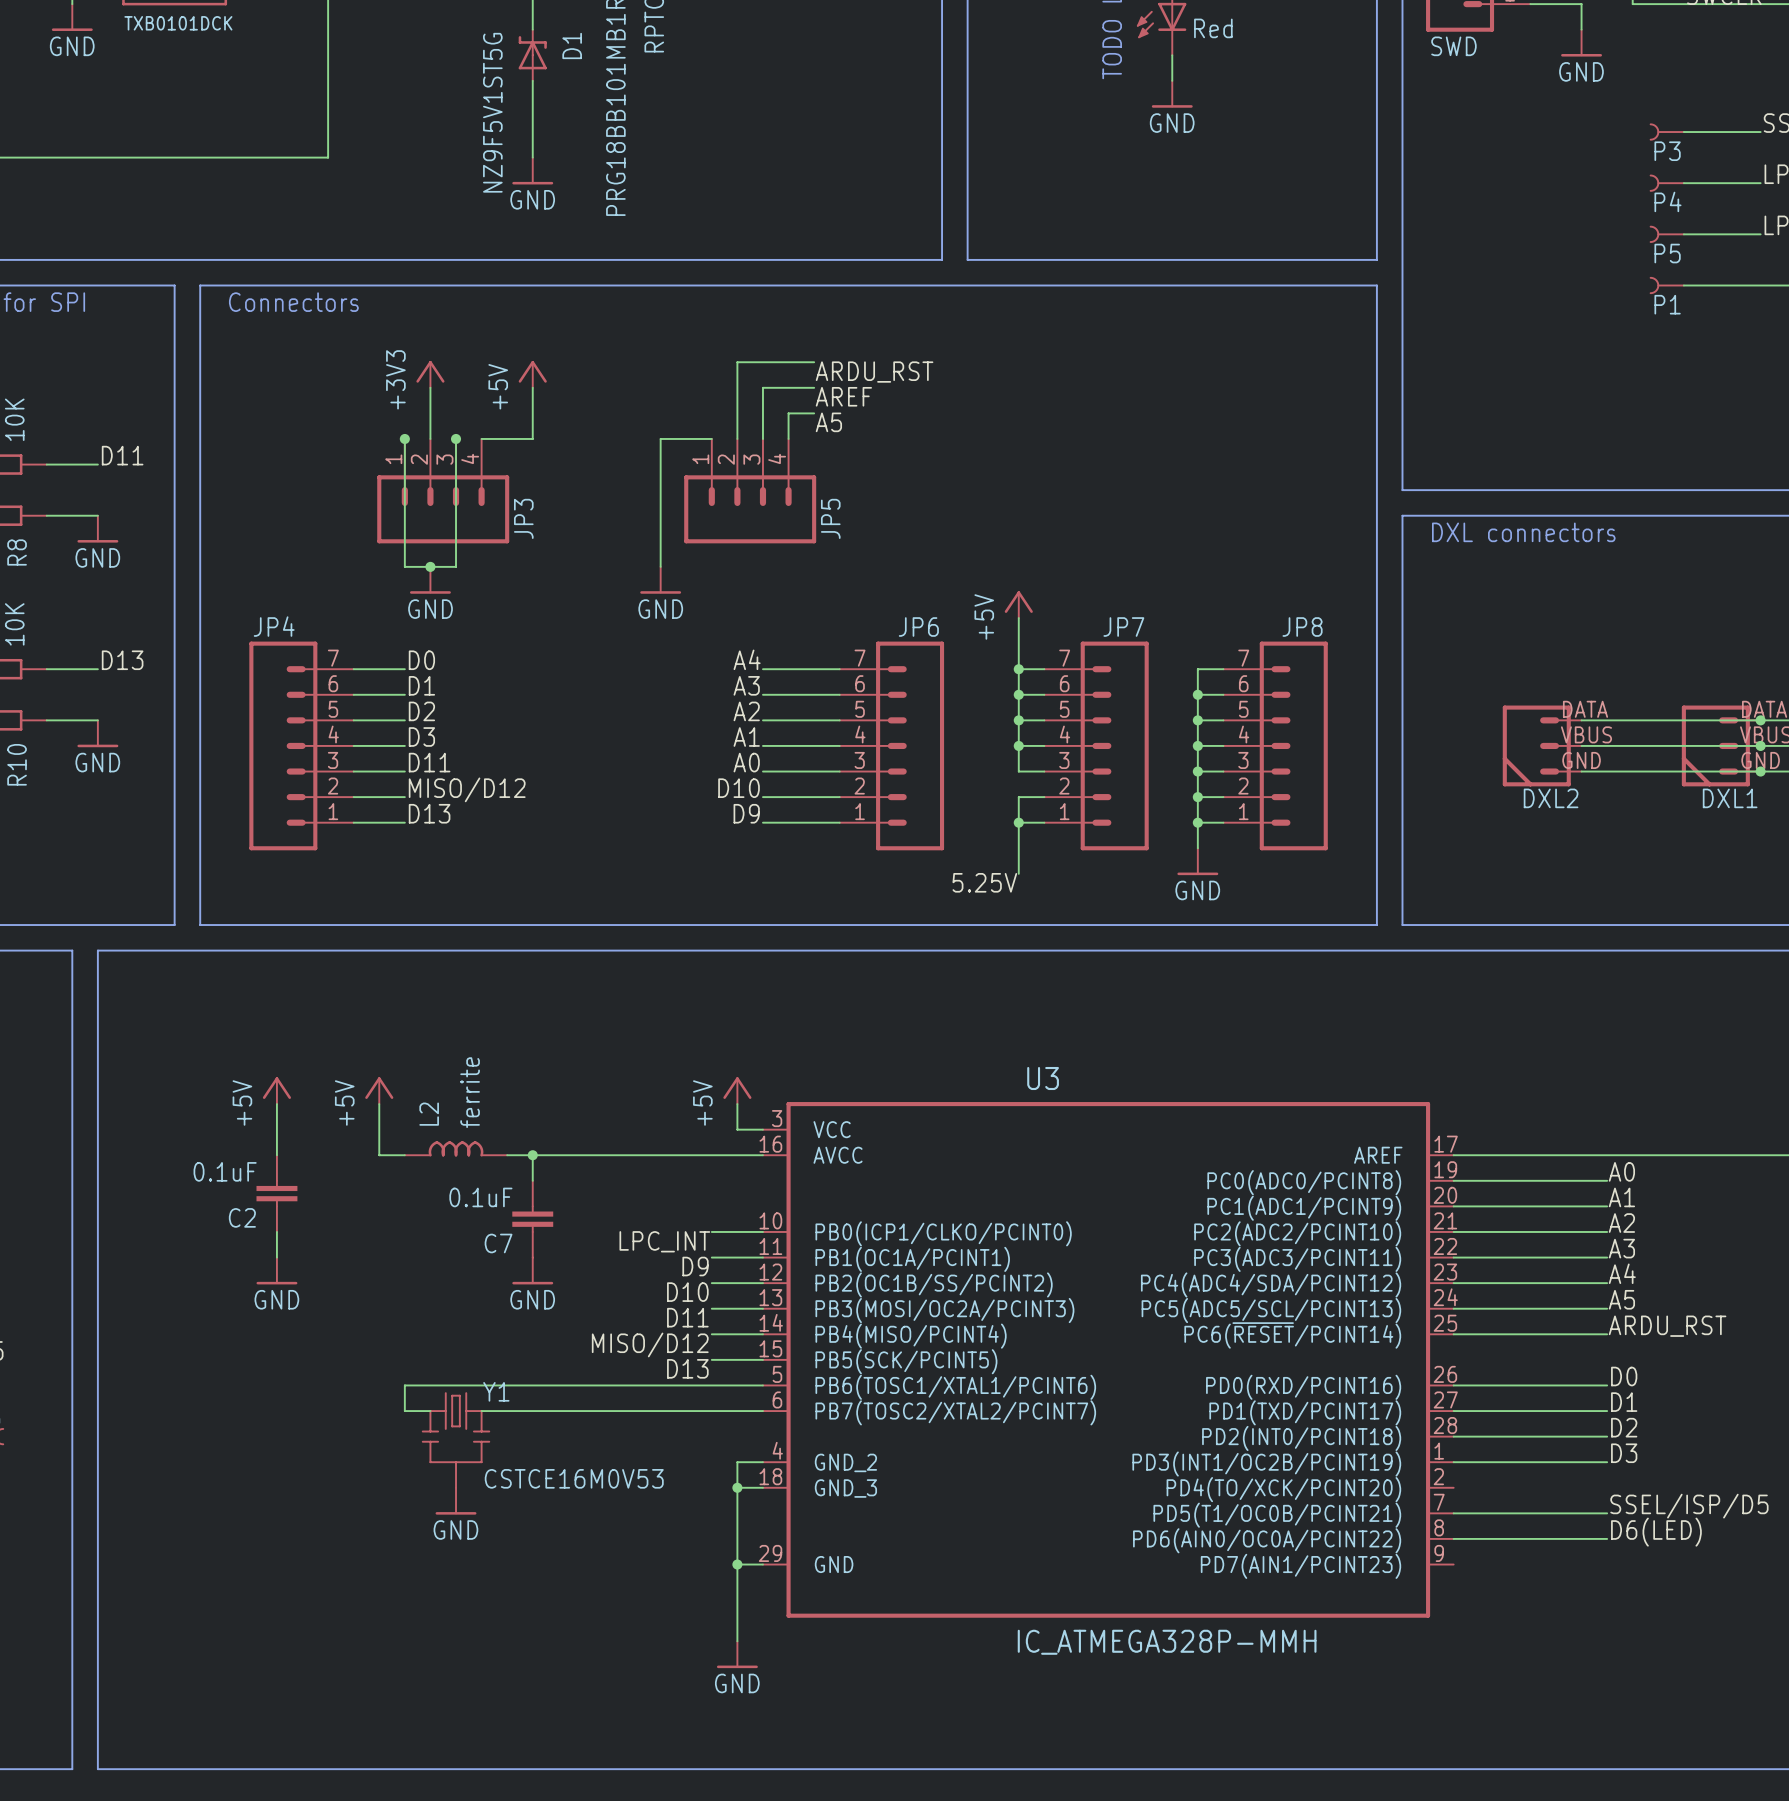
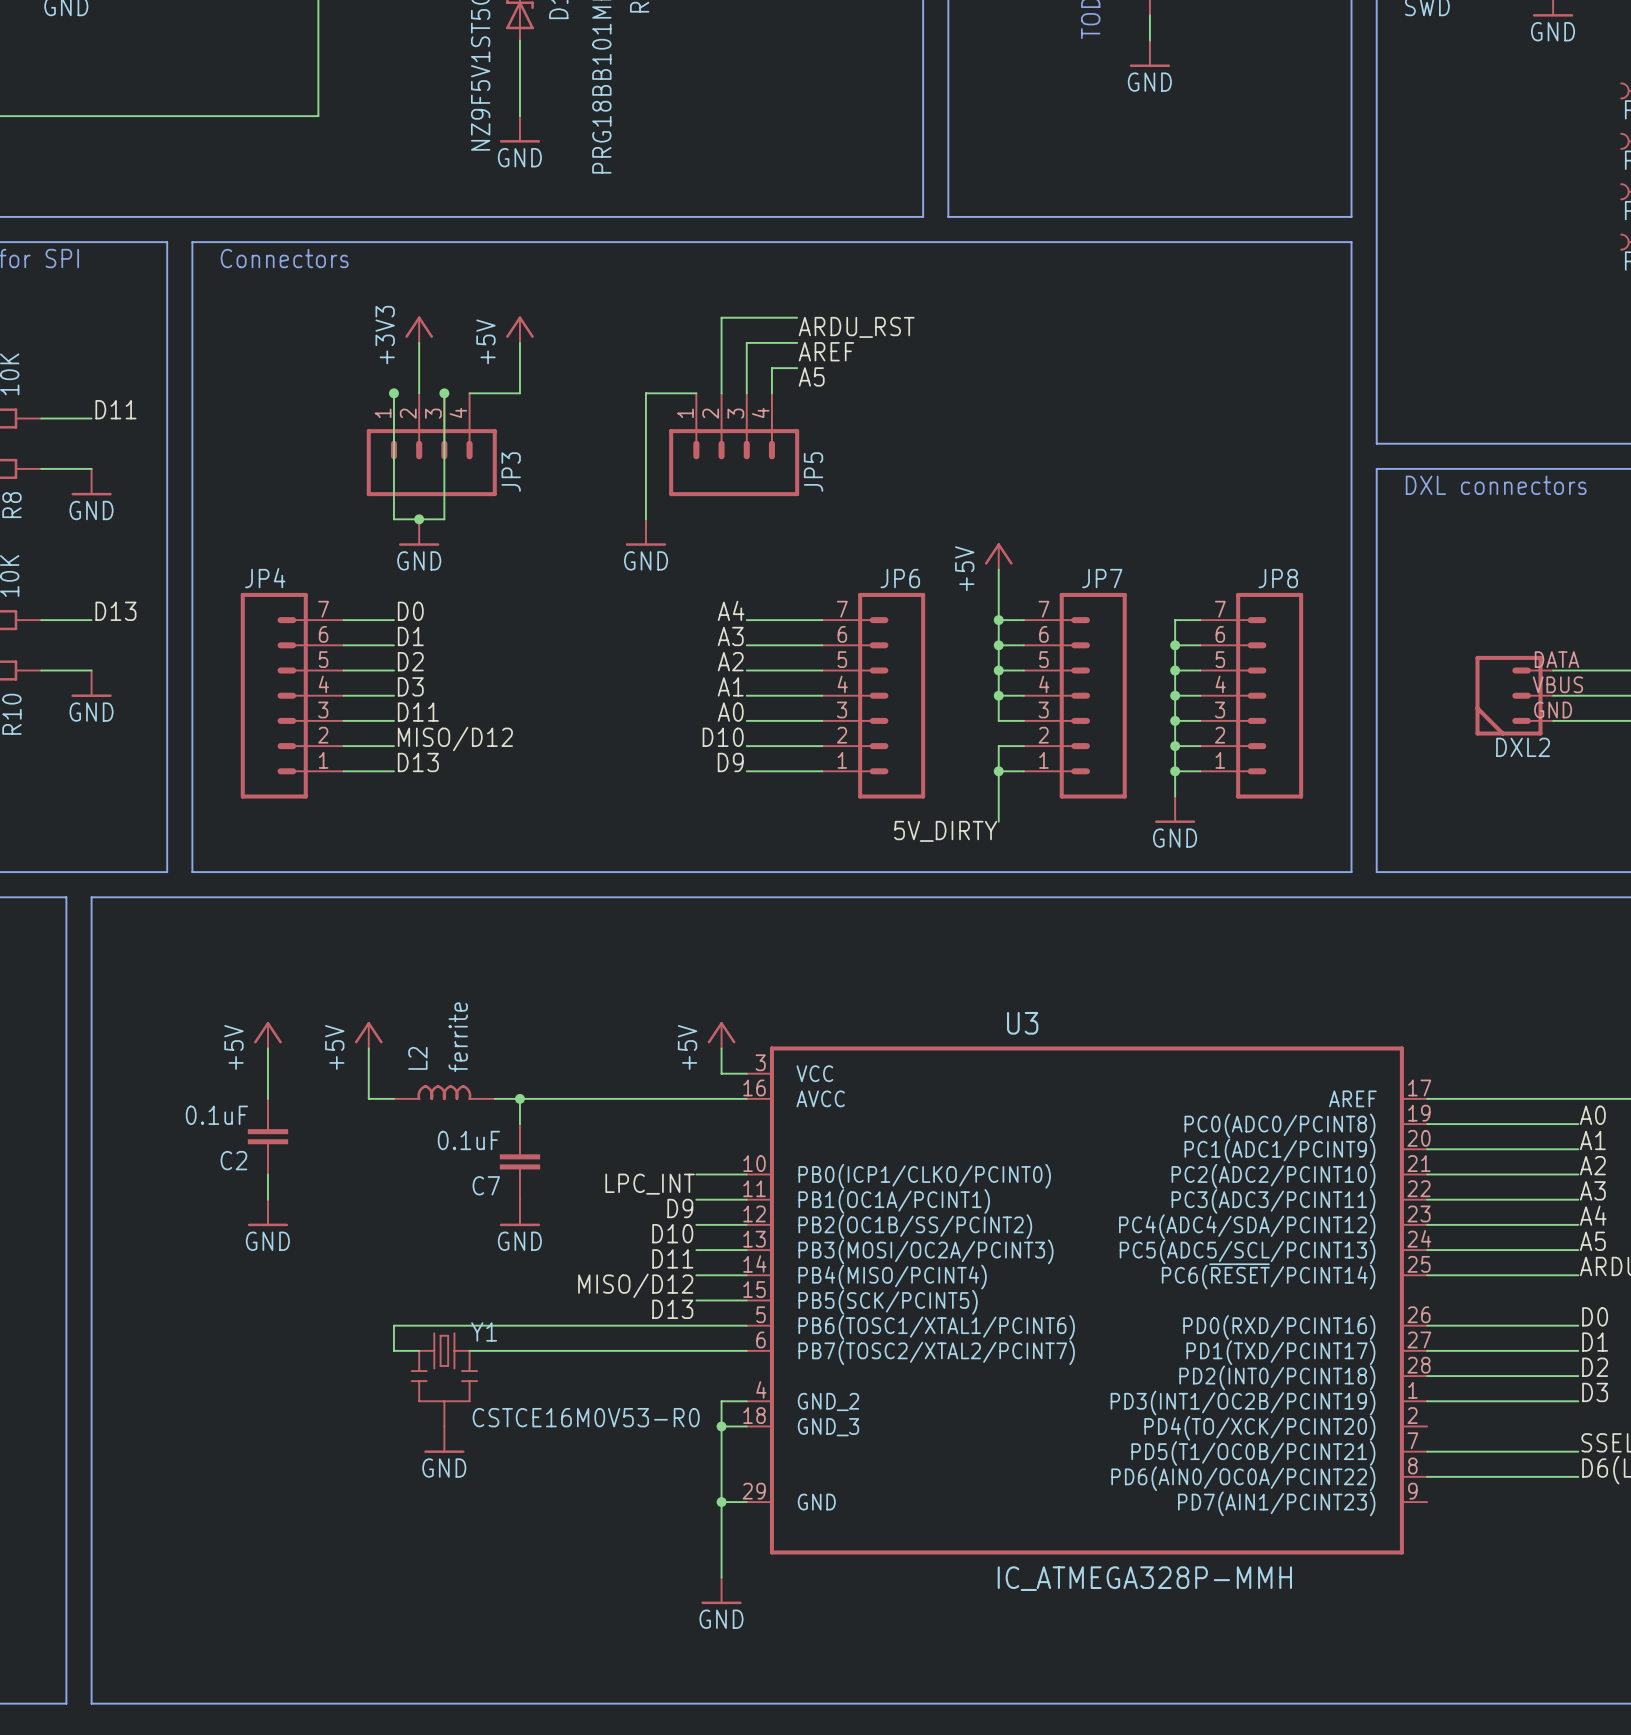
label: 5.25V (984, 882) -> 5V_DIRTY (945, 831)
Y1 value: CSTCE16M0V53 (574, 1478) -> CSTCE16M0V53-R0 (586, 1417)

